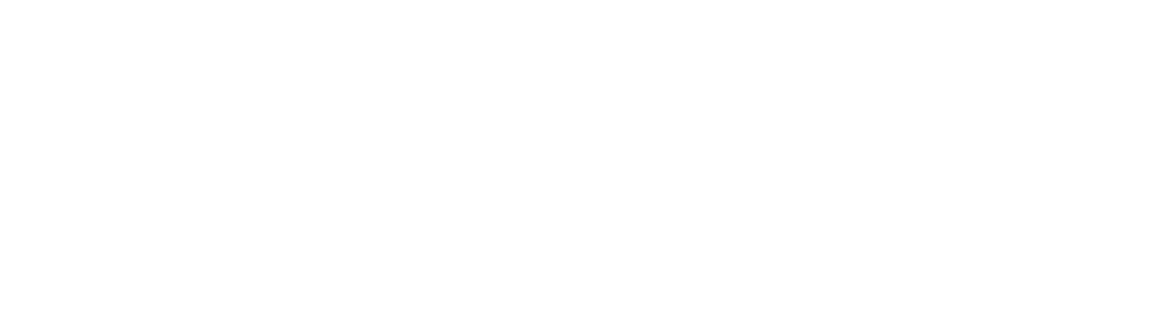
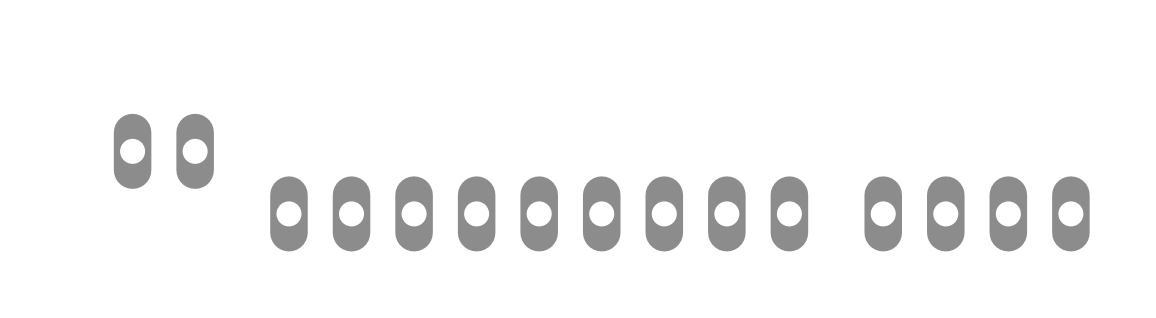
part: none -> (163, 151)
part: none -> (539, 213)
part: none -> (977, 213)

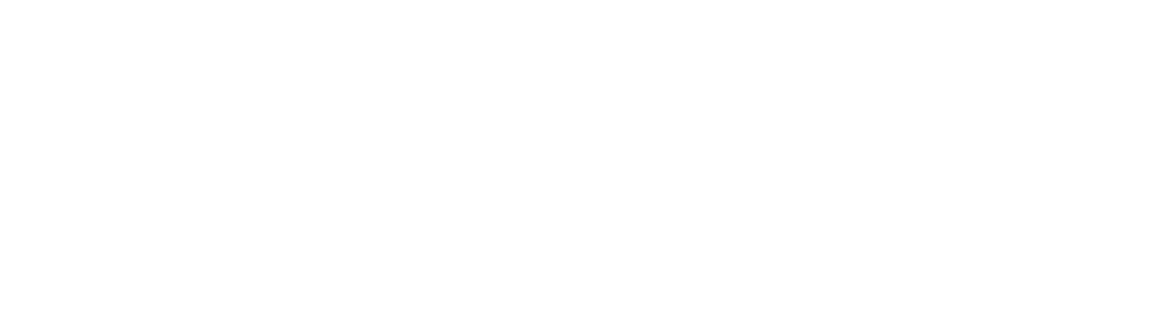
part: (163, 151) -> none
part: (539, 213) -> none
part: (977, 213) -> none

